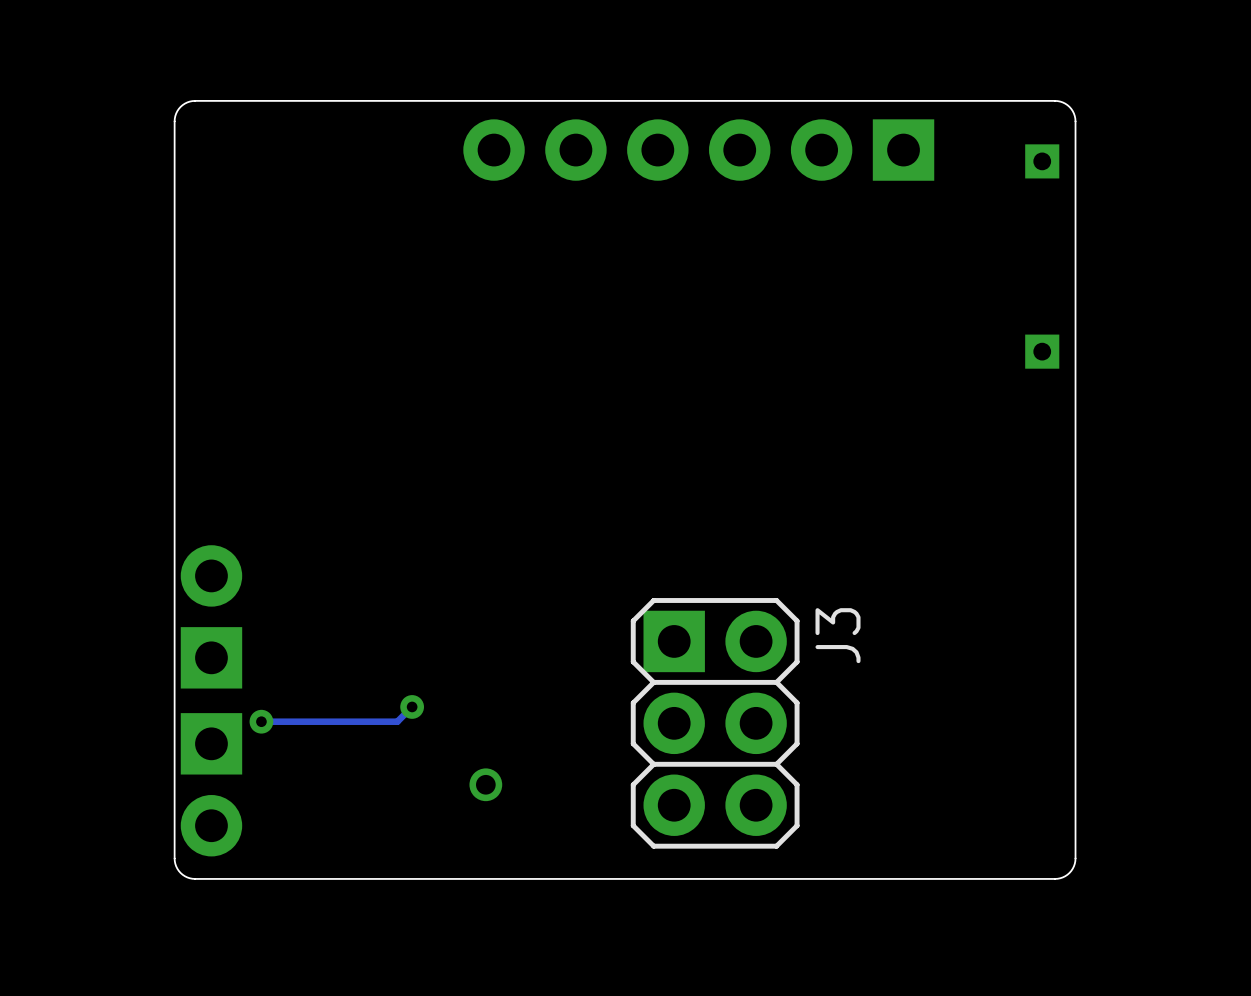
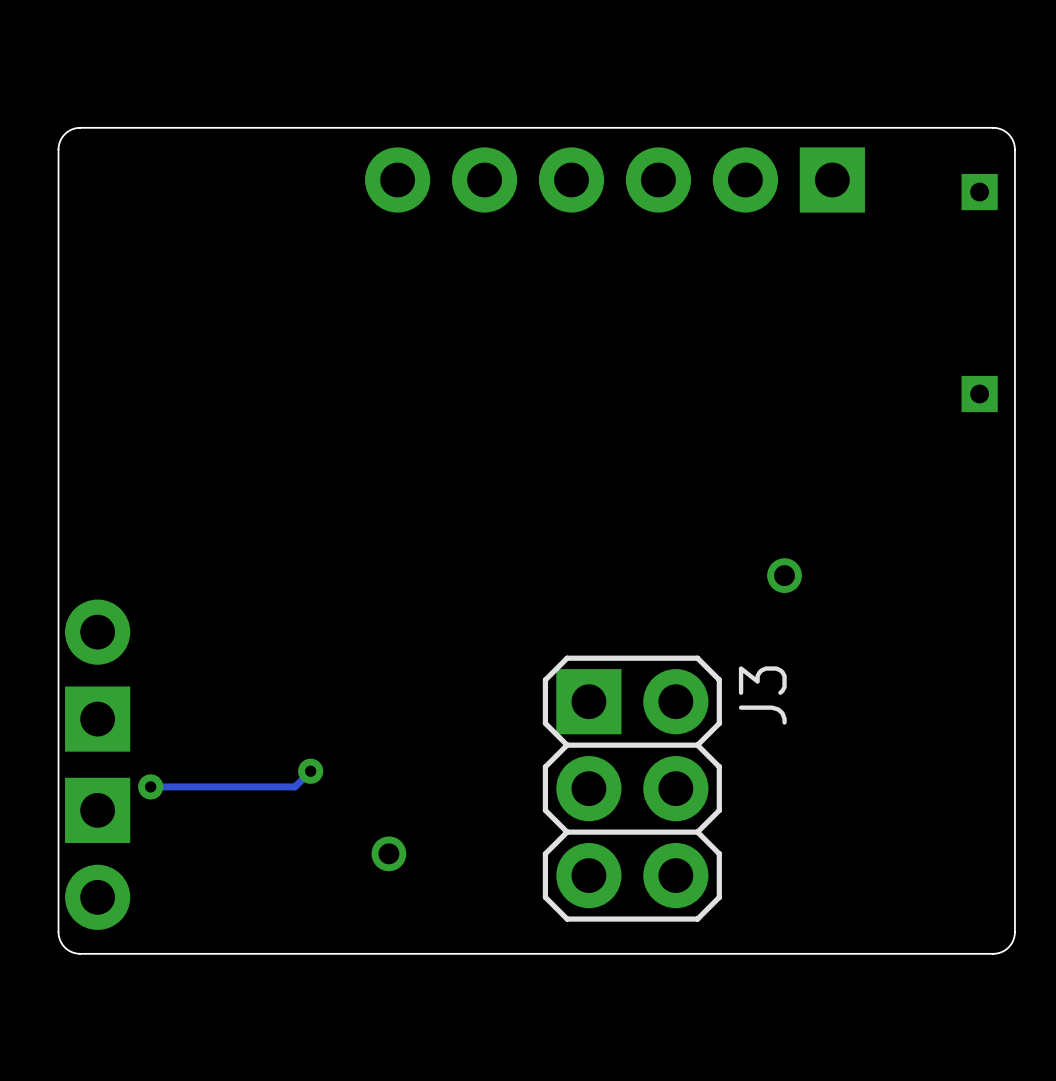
via: none -> (784, 575)

